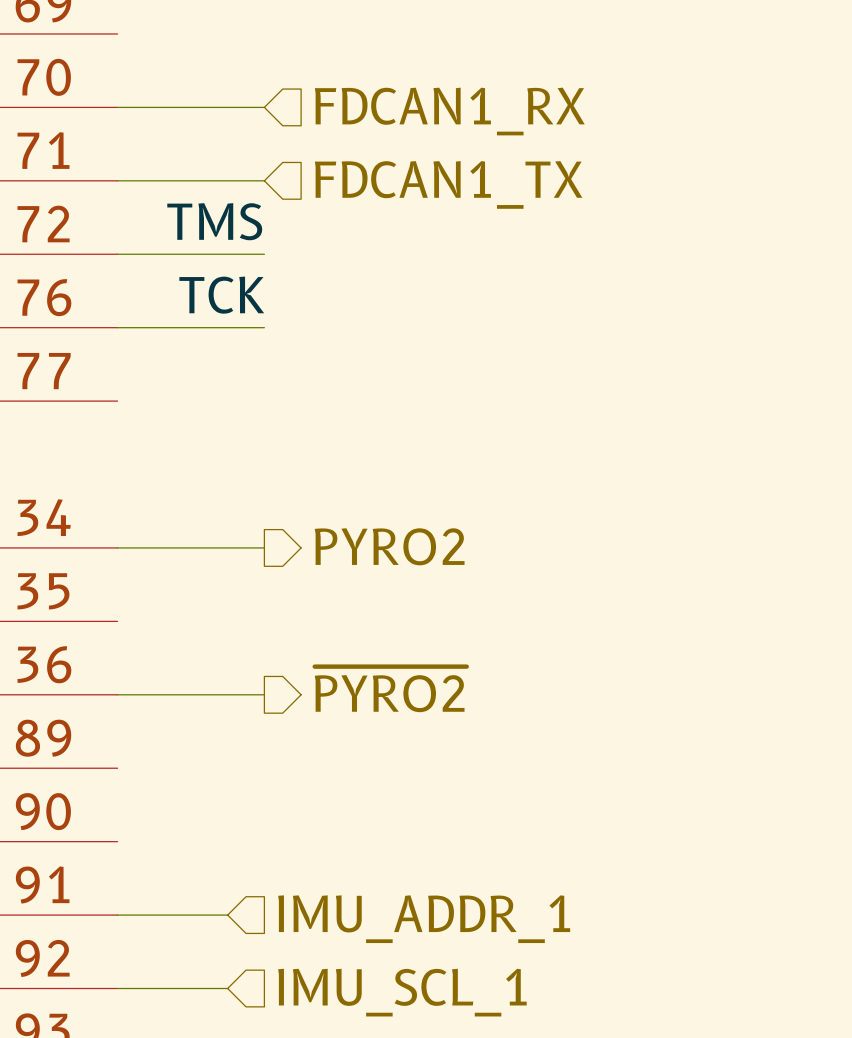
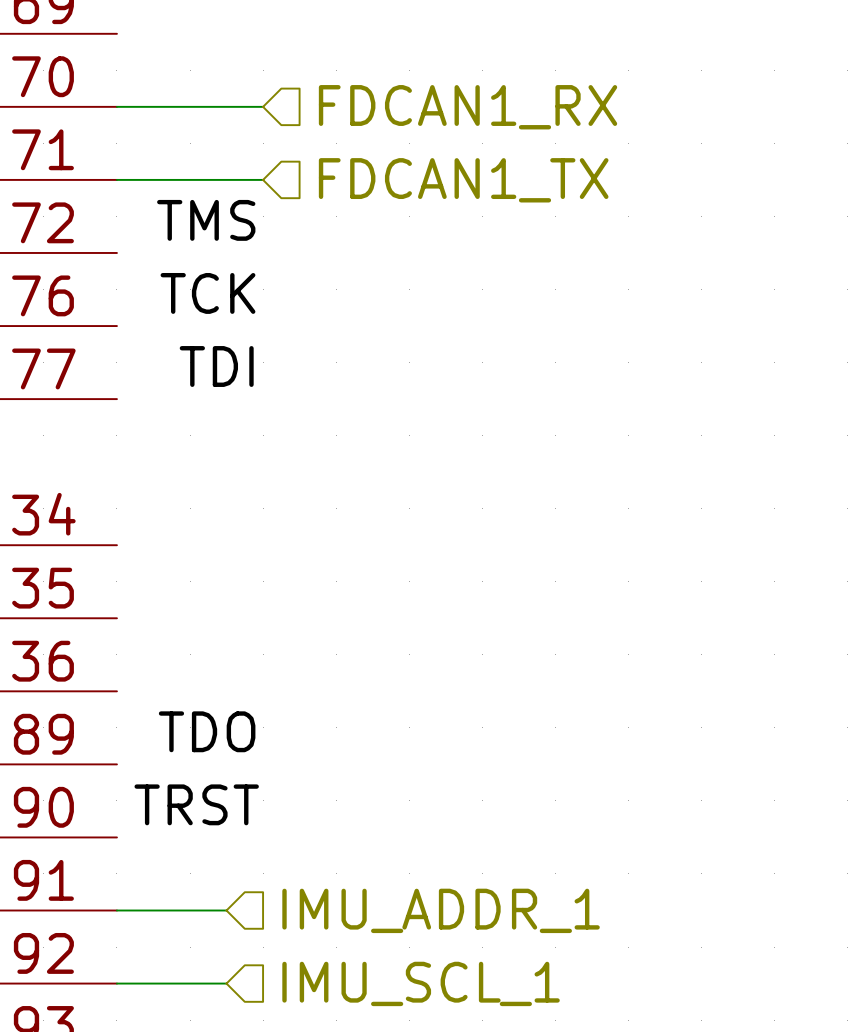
wire: (117, 254) (264, 254) -> none
wire: (117, 327) (264, 327) -> none
label: none -> TDI (216, 366)
hierarchical label: PYRO2 (389, 546) -> none
wire: (117, 547) (264, 547) -> none
hierarchical label: ~{PYRO2} (390, 689) -> none
wire: (117, 694) (264, 694) -> none
label: none -> TDO (207, 731)
label: none -> TRST (196, 804)

